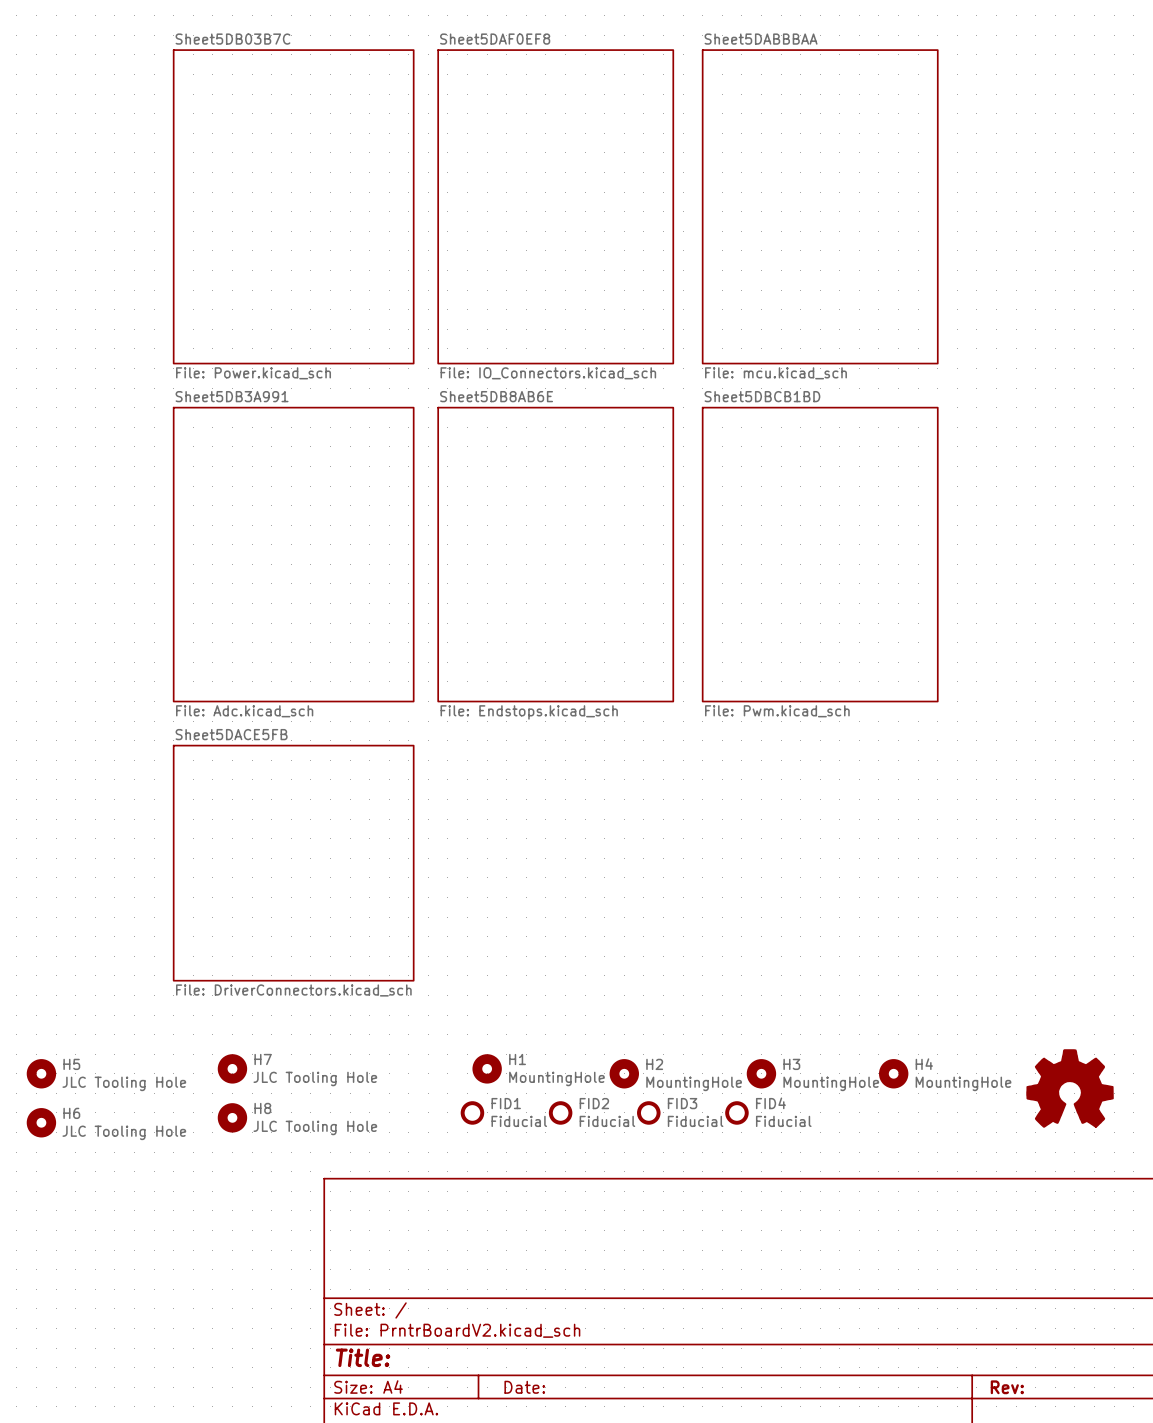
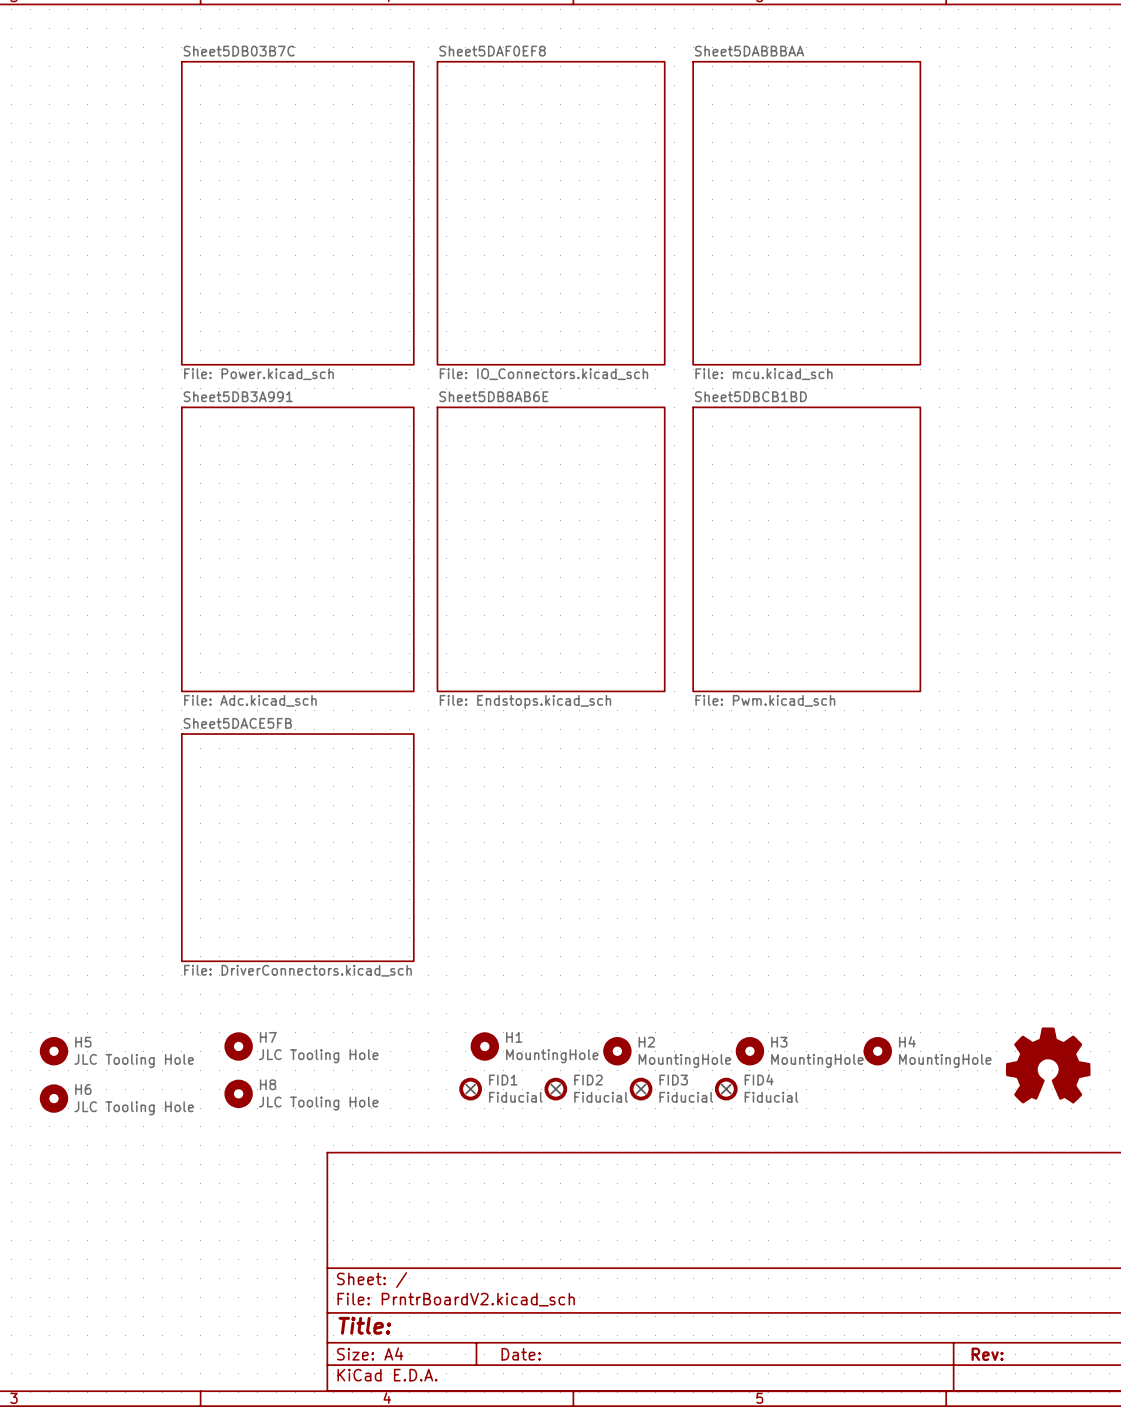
no-connect mark: none -> (470, 1089)
no-connect mark: none -> (555, 1089)
no-connect mark: none -> (641, 1089)
no-connect mark: none -> (726, 1089)

